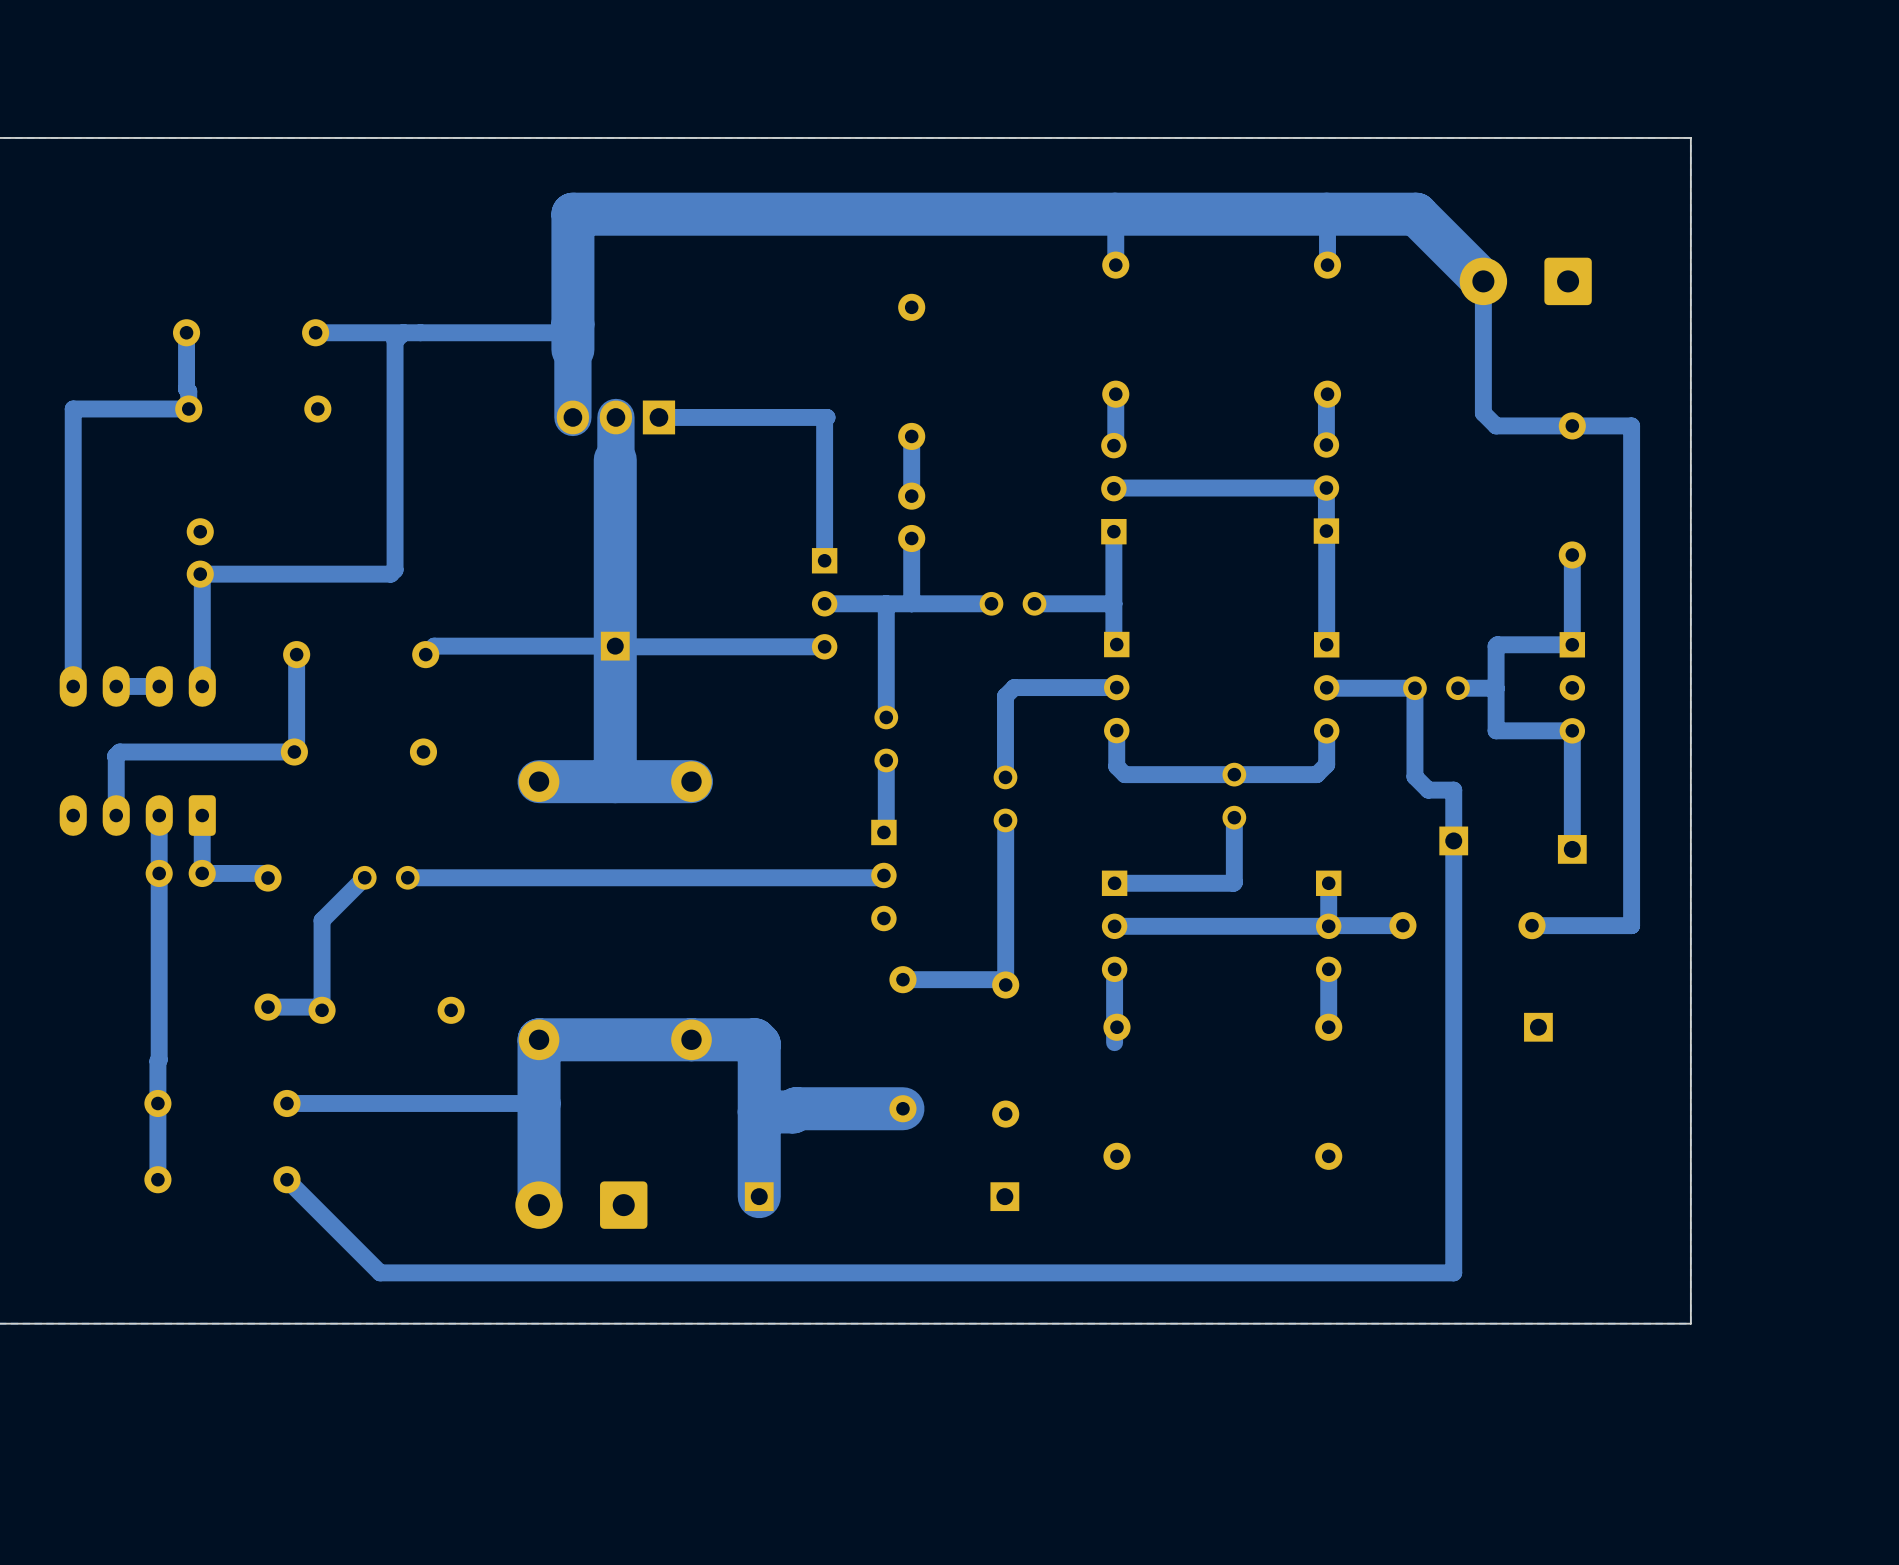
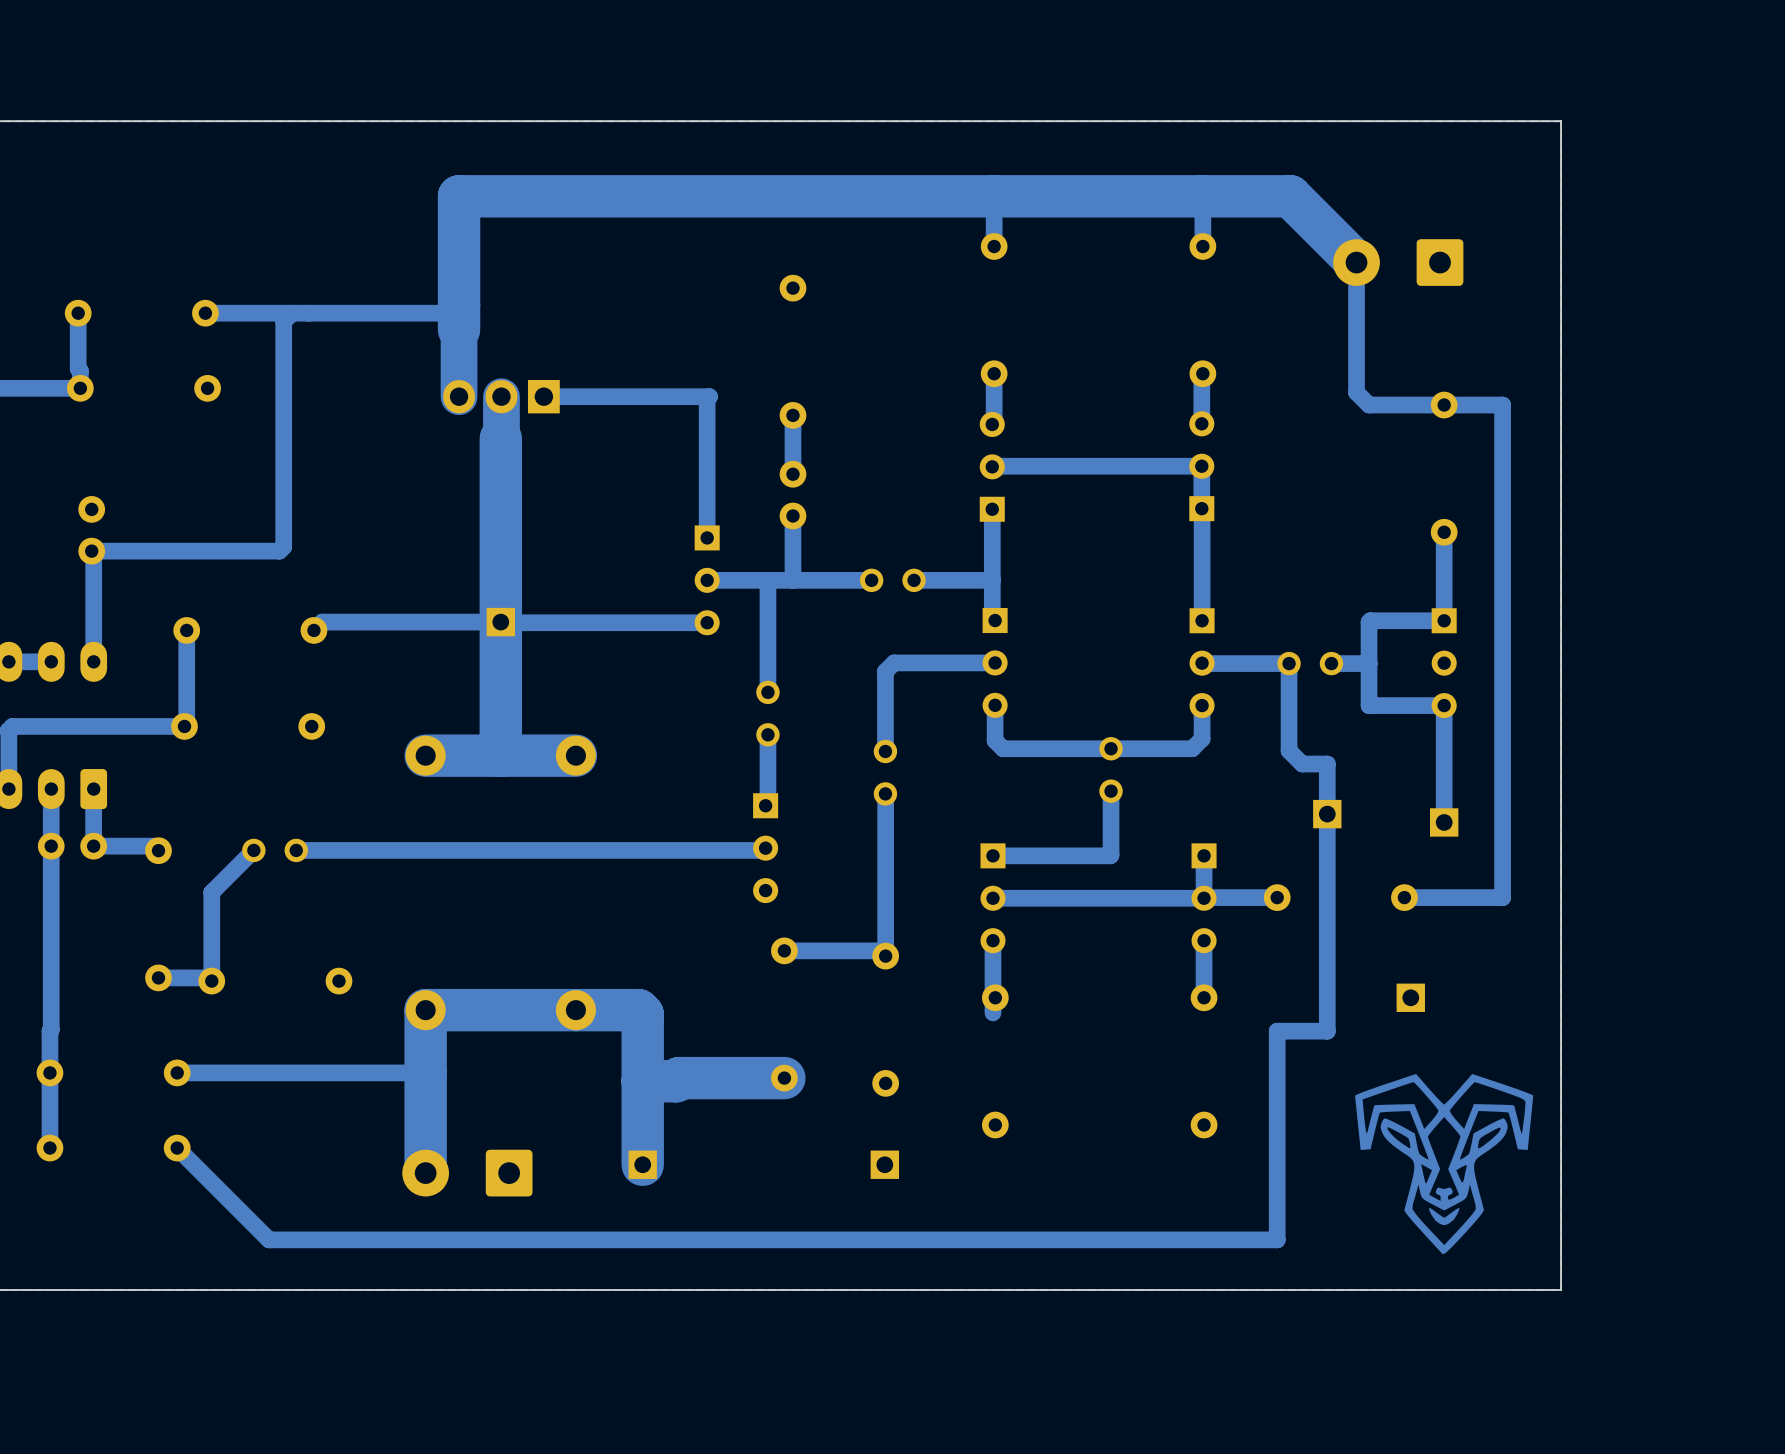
track: (1453, 1061) (1453, 1272) (1402, 1272) -> (1327, 1031) (1277, 1031) (1277, 1239)
drawing: none -> [1355, 1073, 1534, 1255]

